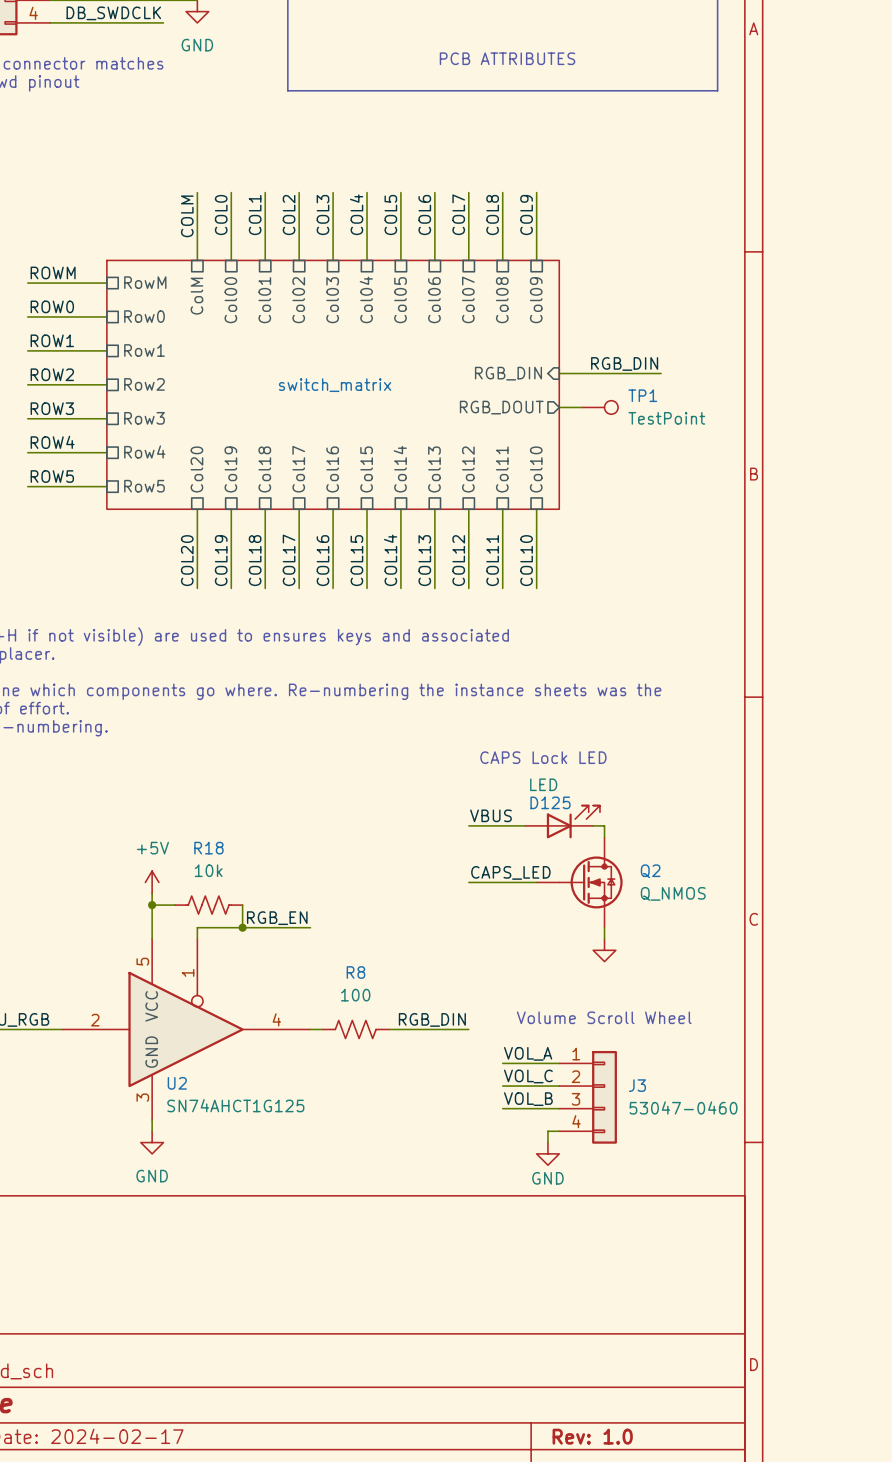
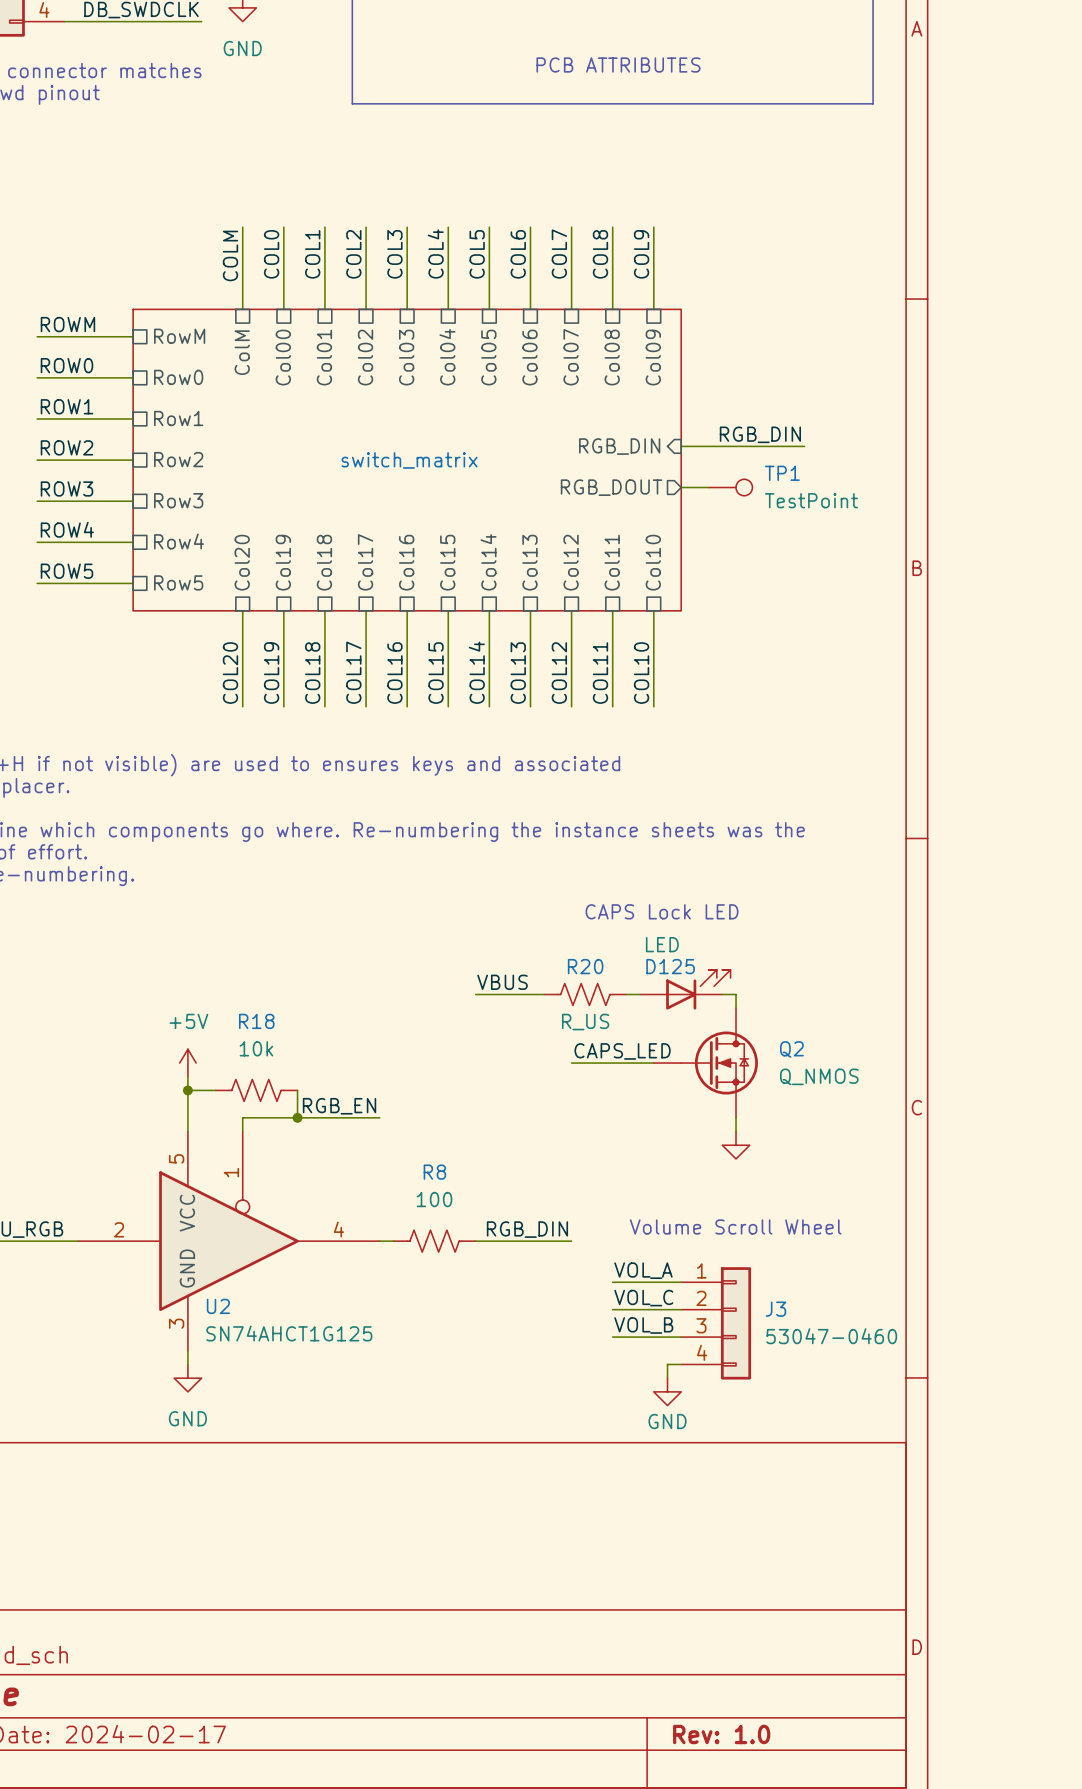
label position: VBUS (490, 815) -> VBUS (502, 982)
wire: none -> (475, 994) (544, 994)
wire: (468, 825) (514, 825) -> none
R20: none -> R_US (585, 994)

